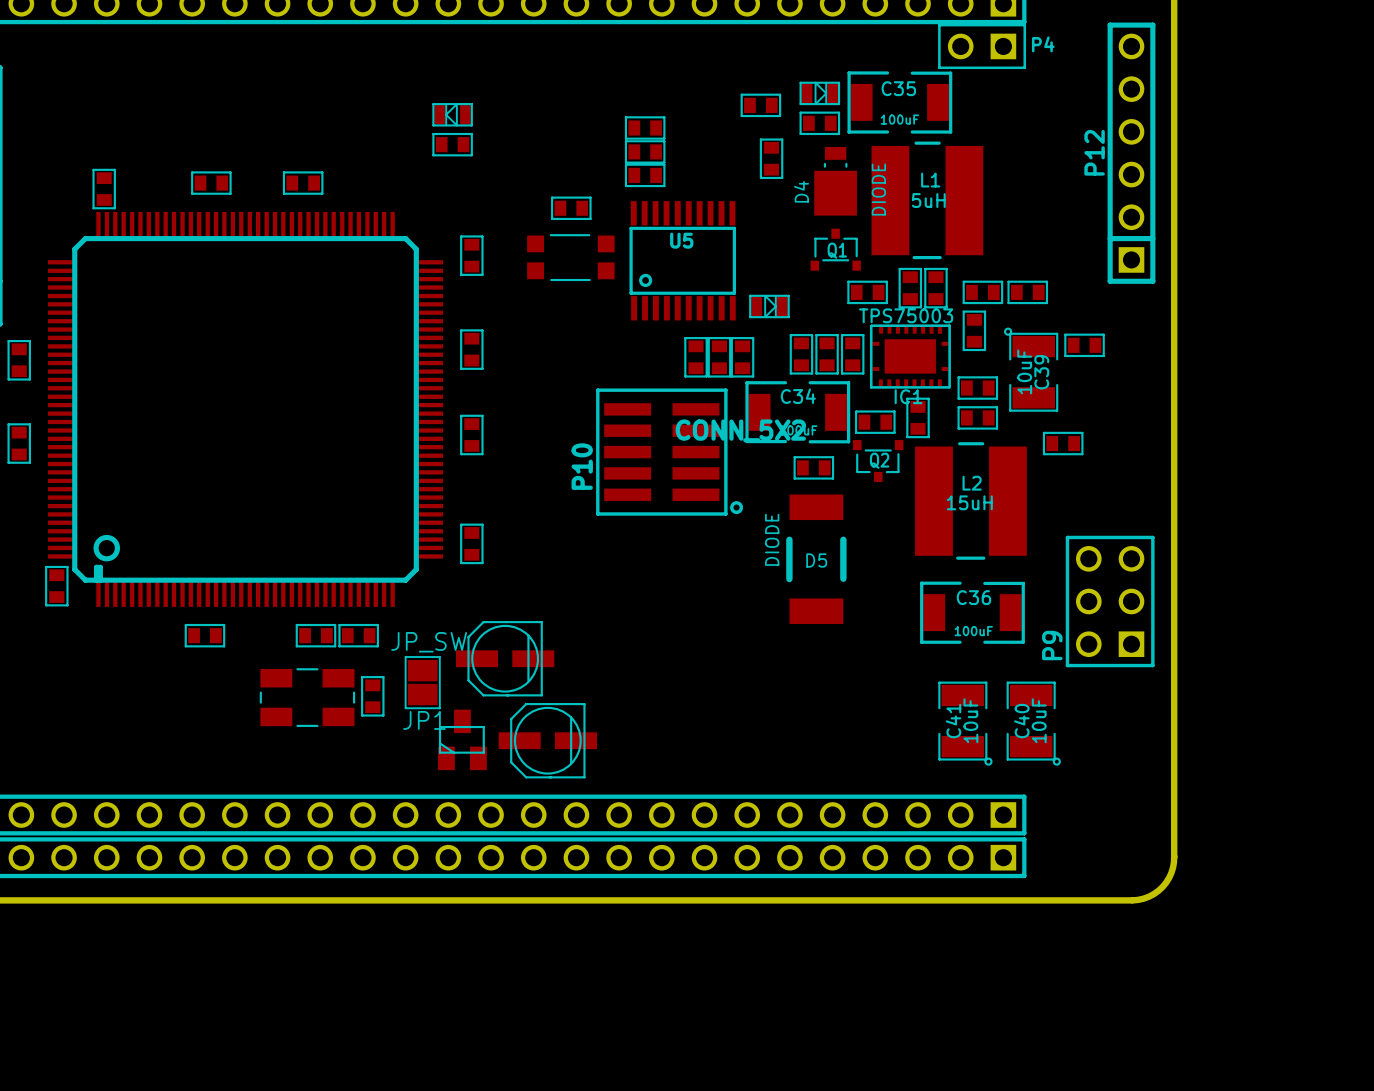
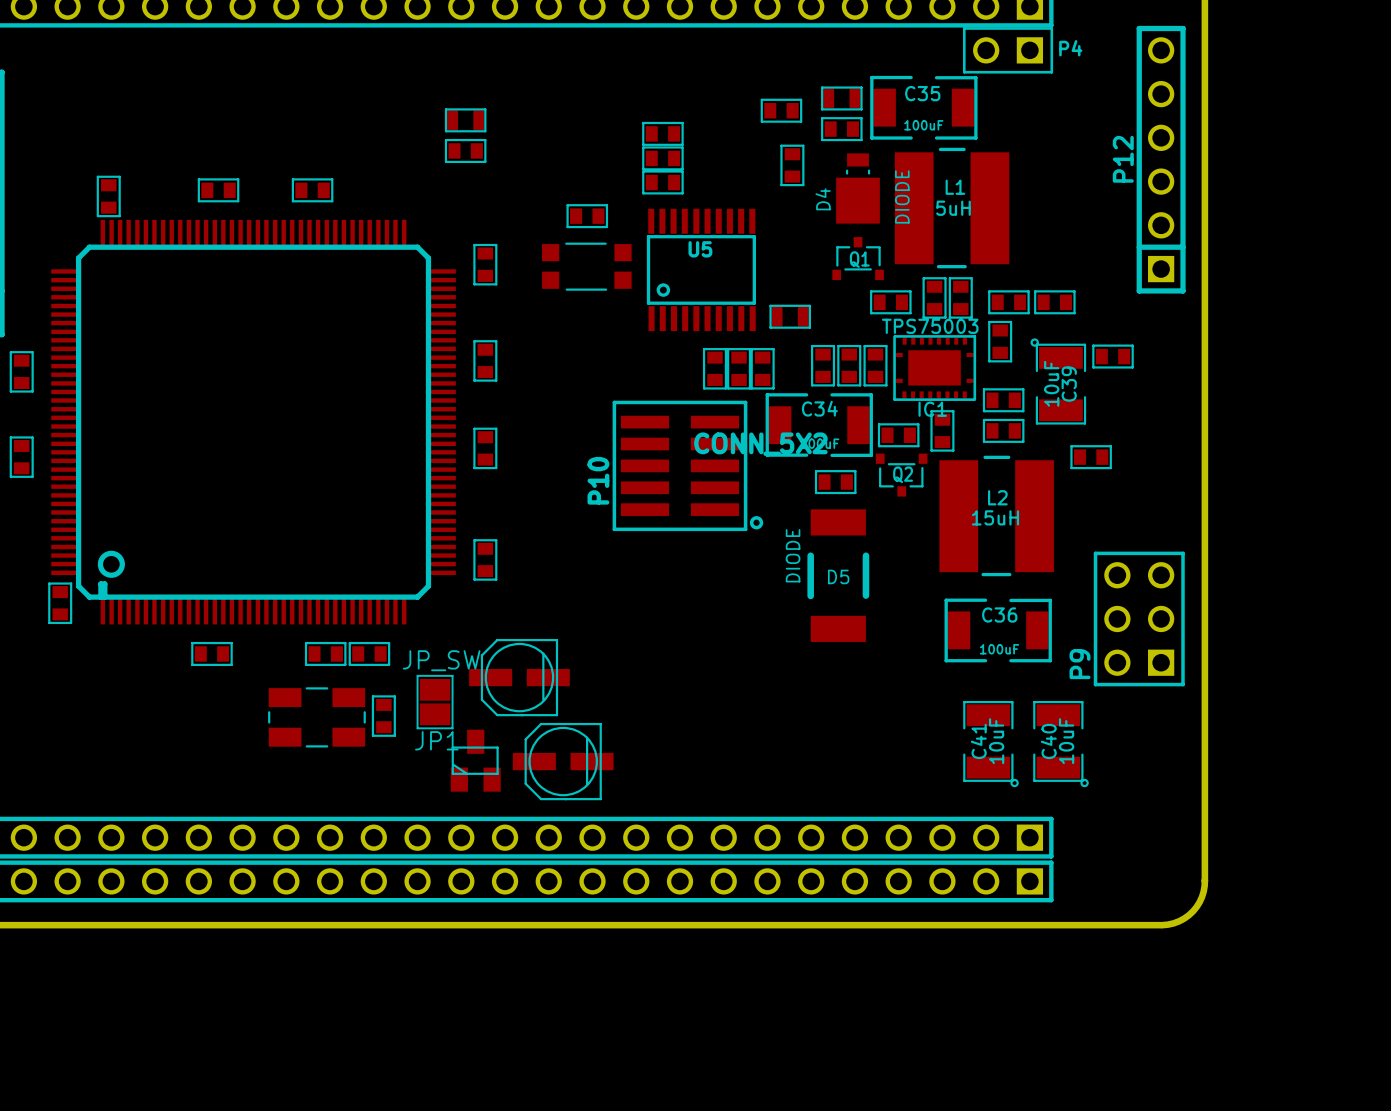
part footprint: [799, 81, 841, 106] -> [821, 86, 863, 111]
part footprint: [432, 103, 473, 127] -> [444, 108, 487, 133]
part footprint: [749, 294, 790, 319] -> [769, 304, 811, 329]

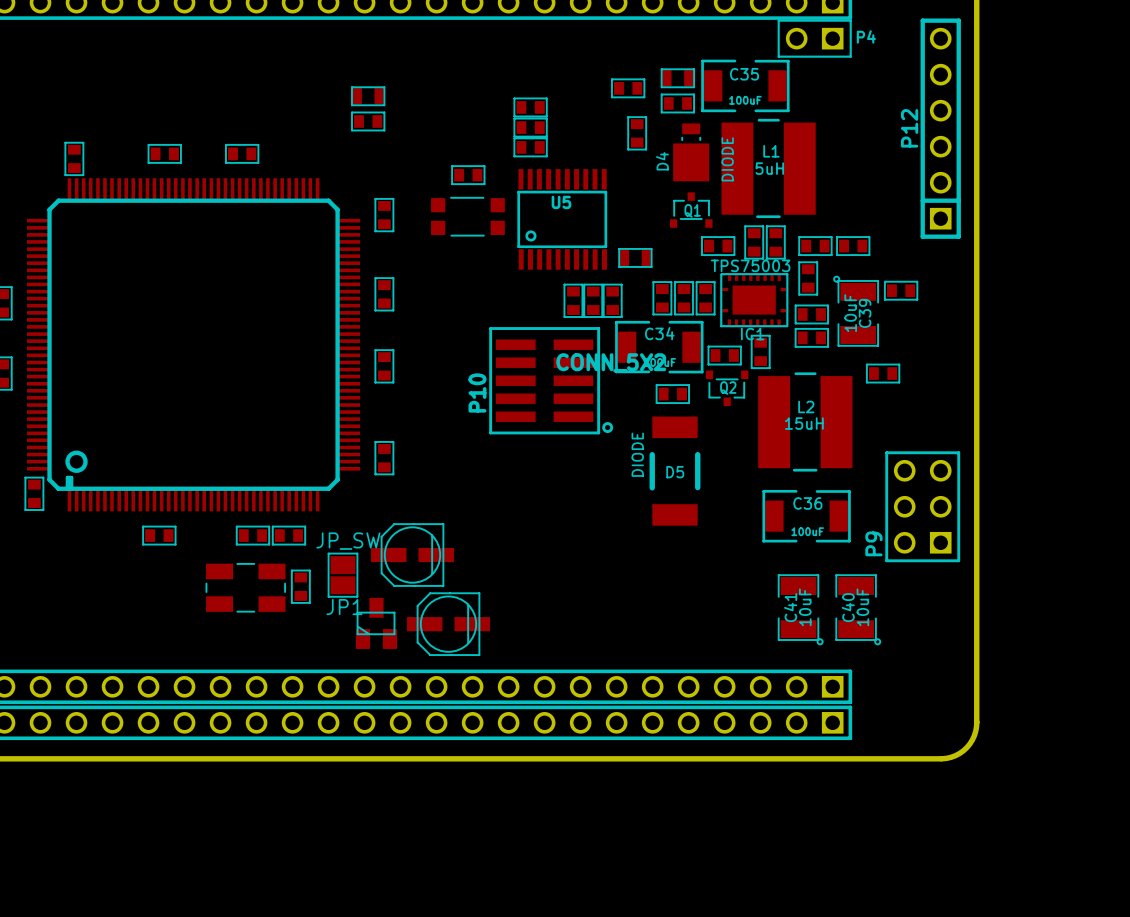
part: none -> (811, 314)
part: (1003, 400) -> none
part: none -> (811, 337)
part: (1003, 430) -> none

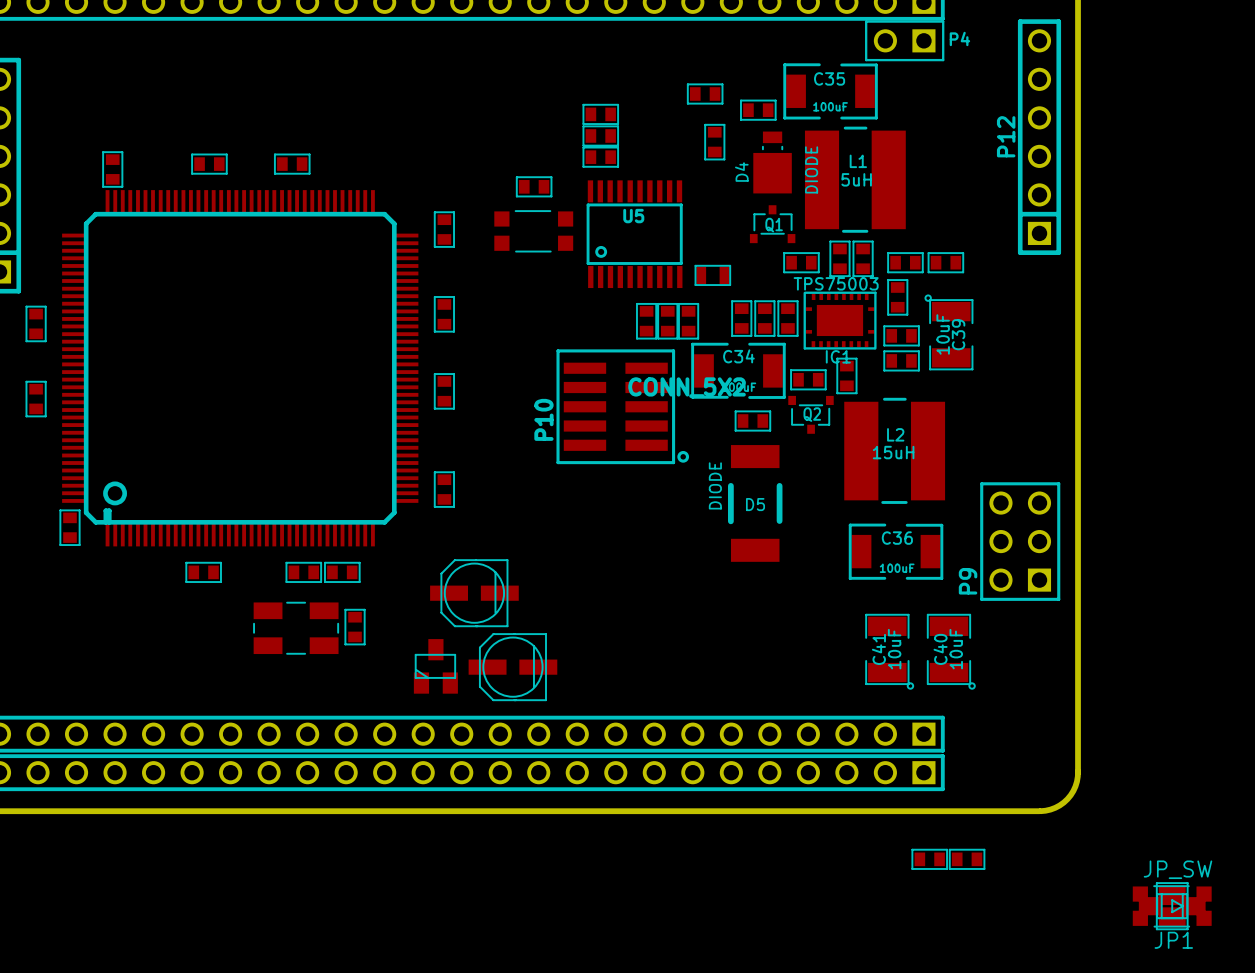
part: (677, 78) -> none
part: (368, 96) -> none
part: (368, 121) -> none
part: (901, 290) -> none
part: (883, 373) -> none
JP1 position: (342, 575) -> (1172, 906)
part: none -> (929, 859)
part: none -> (967, 859)
part: none -> (1172, 906)
part: none -> (1172, 906)

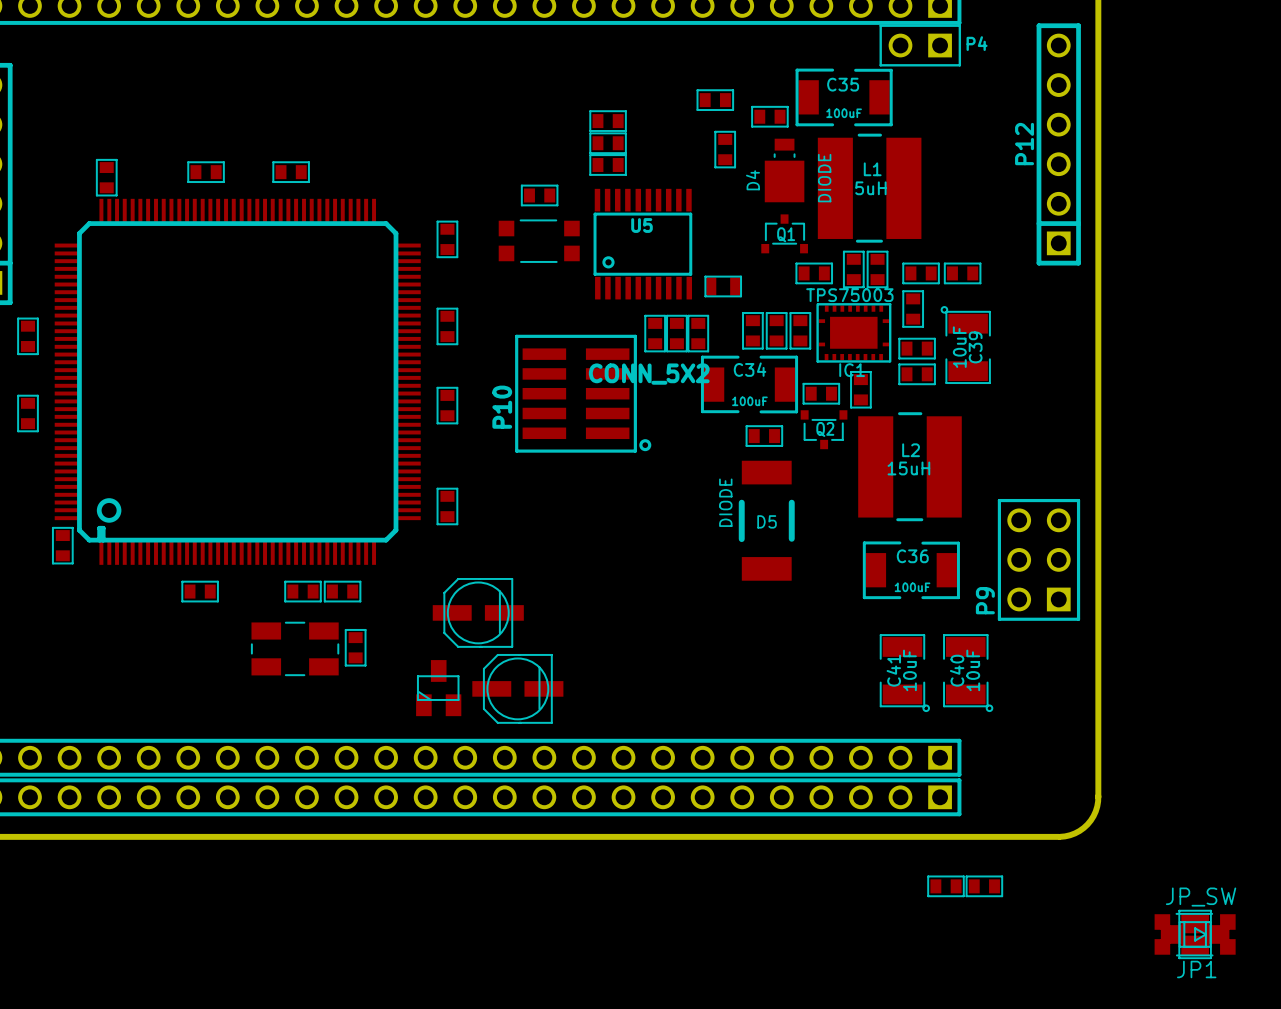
P10 position: (622, 406) -> (583, 393)

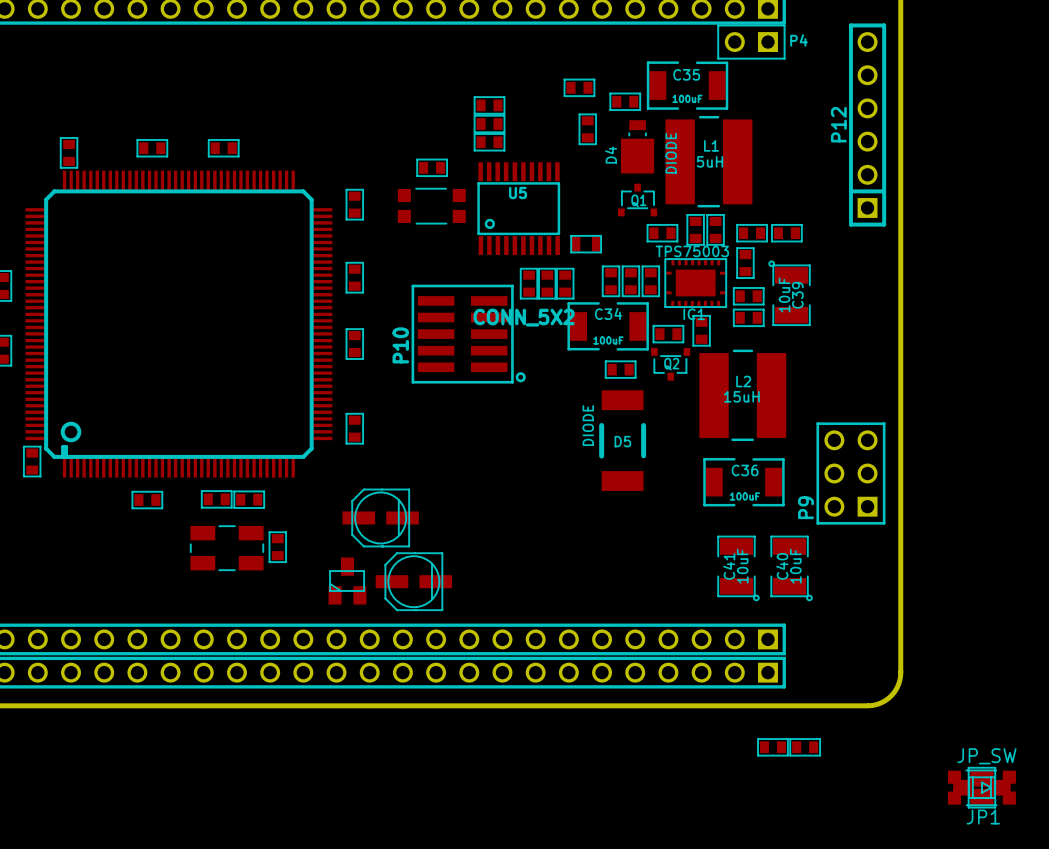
part: none -> (216, 499)
part: (303, 591) -> none
part: none -> (249, 499)
part: (342, 591) -> none

